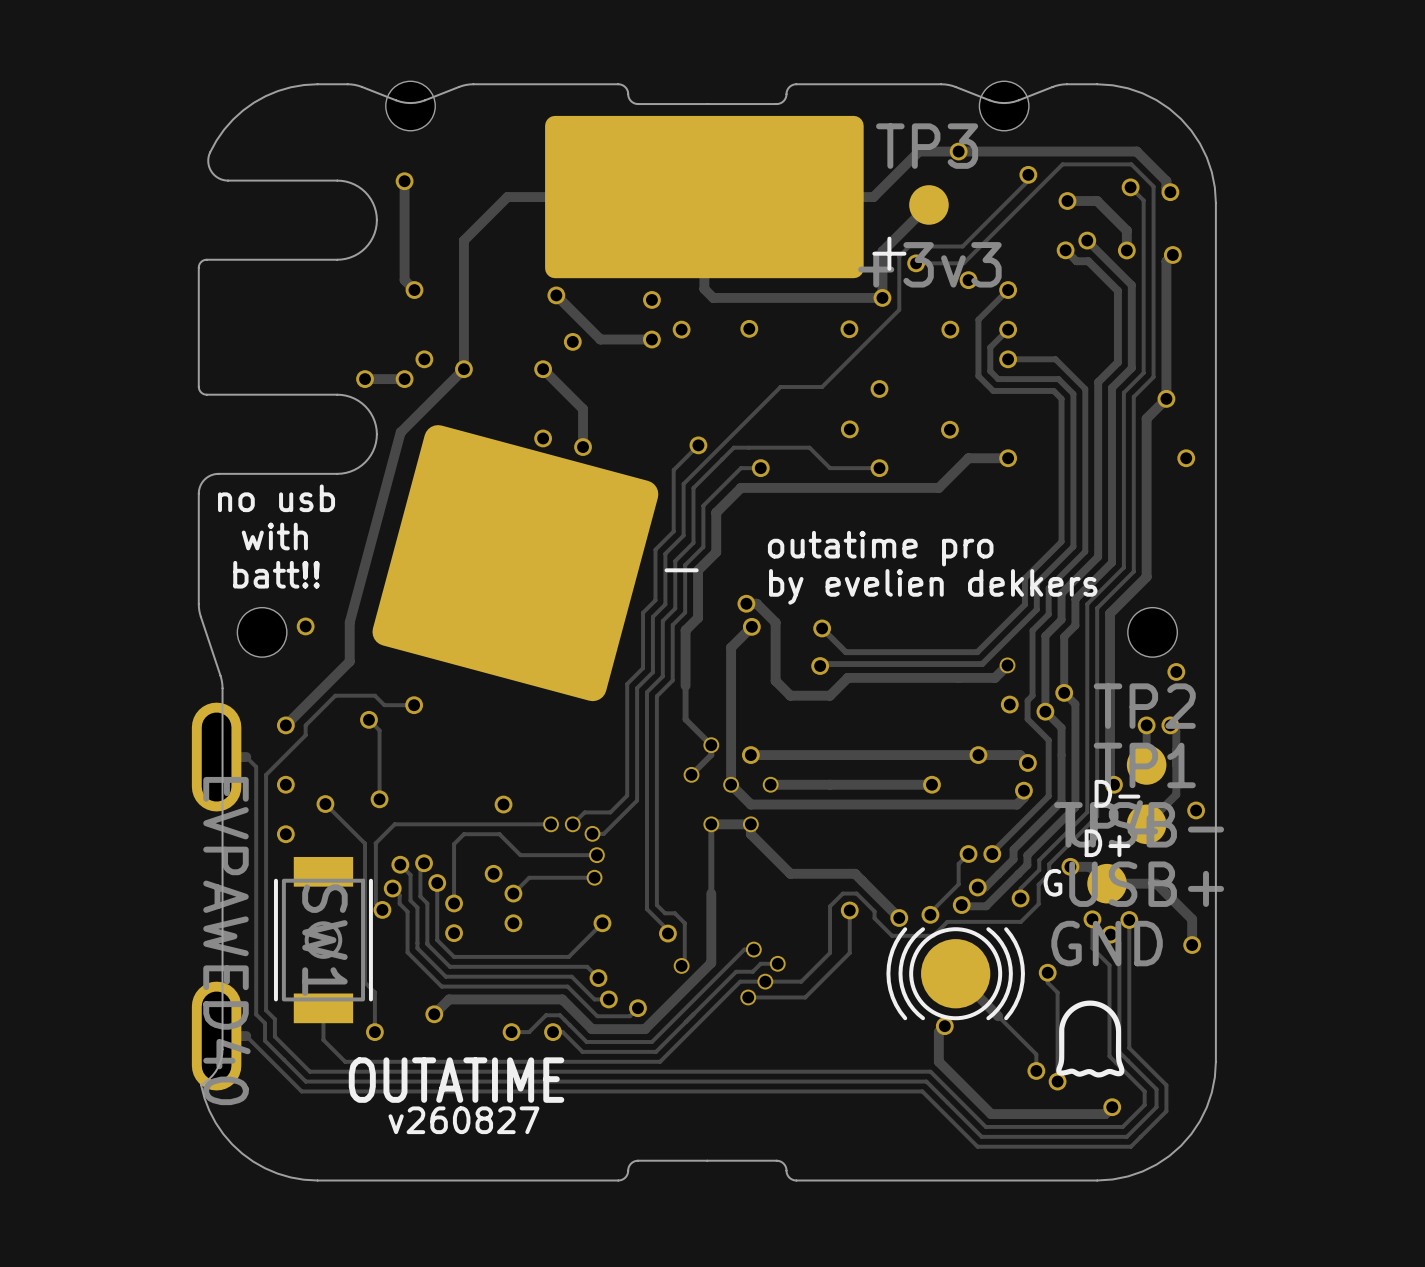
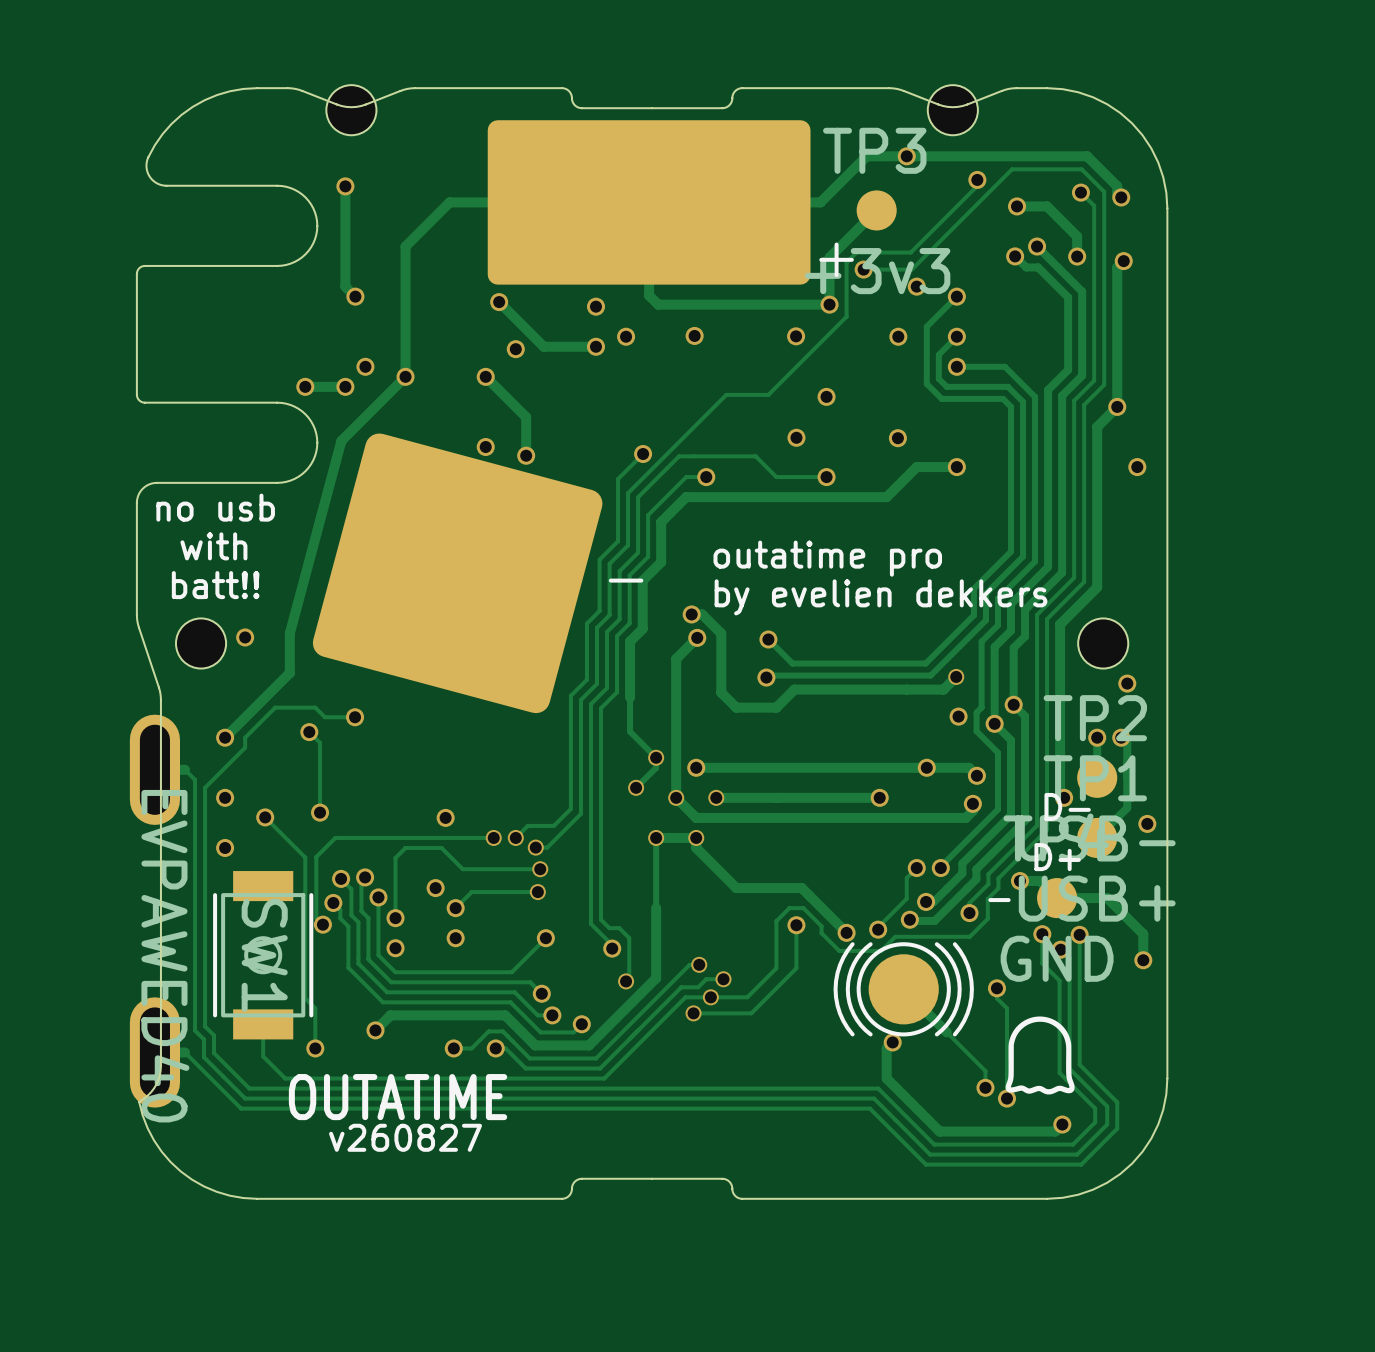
text: G (1053, 882) -> - (999, 900)

